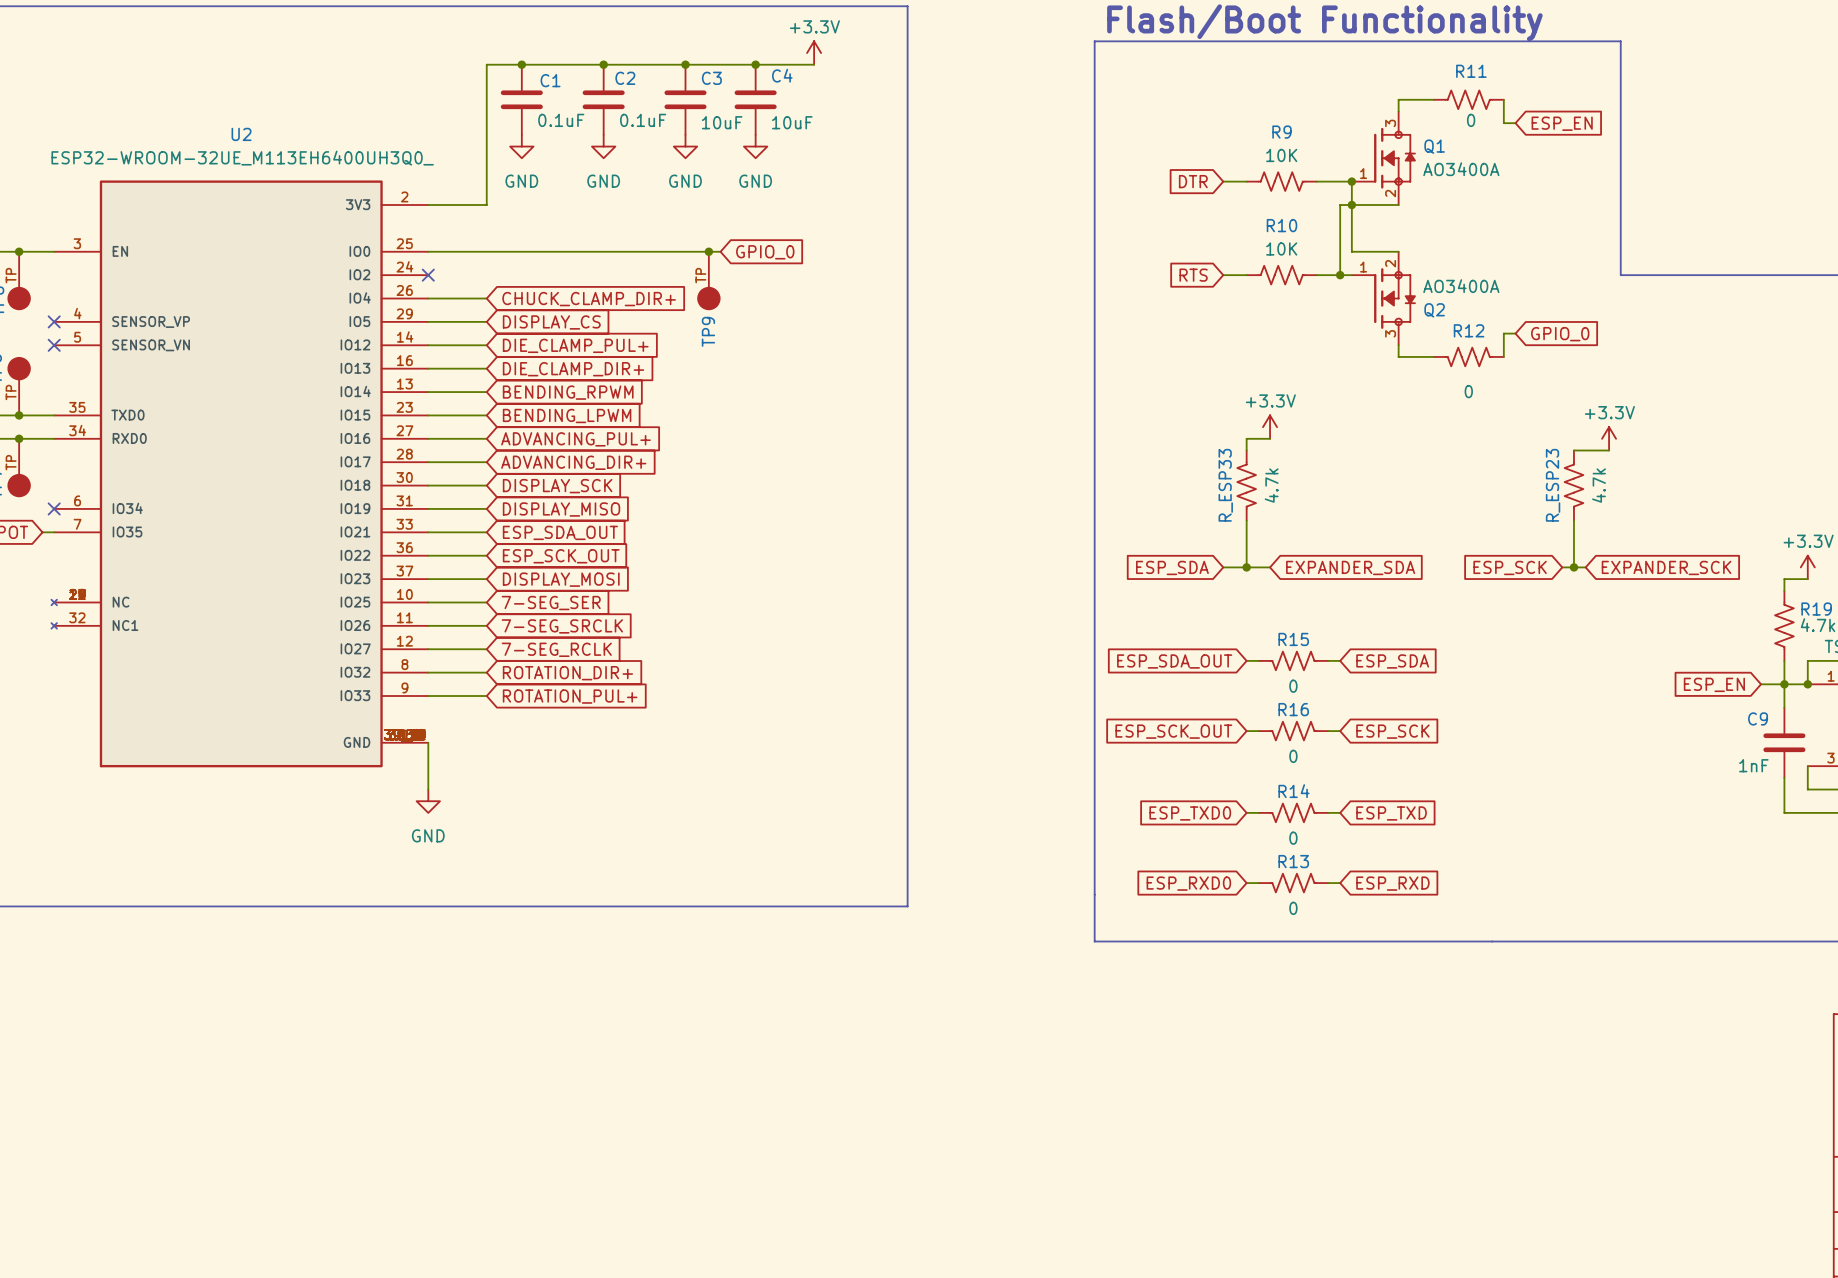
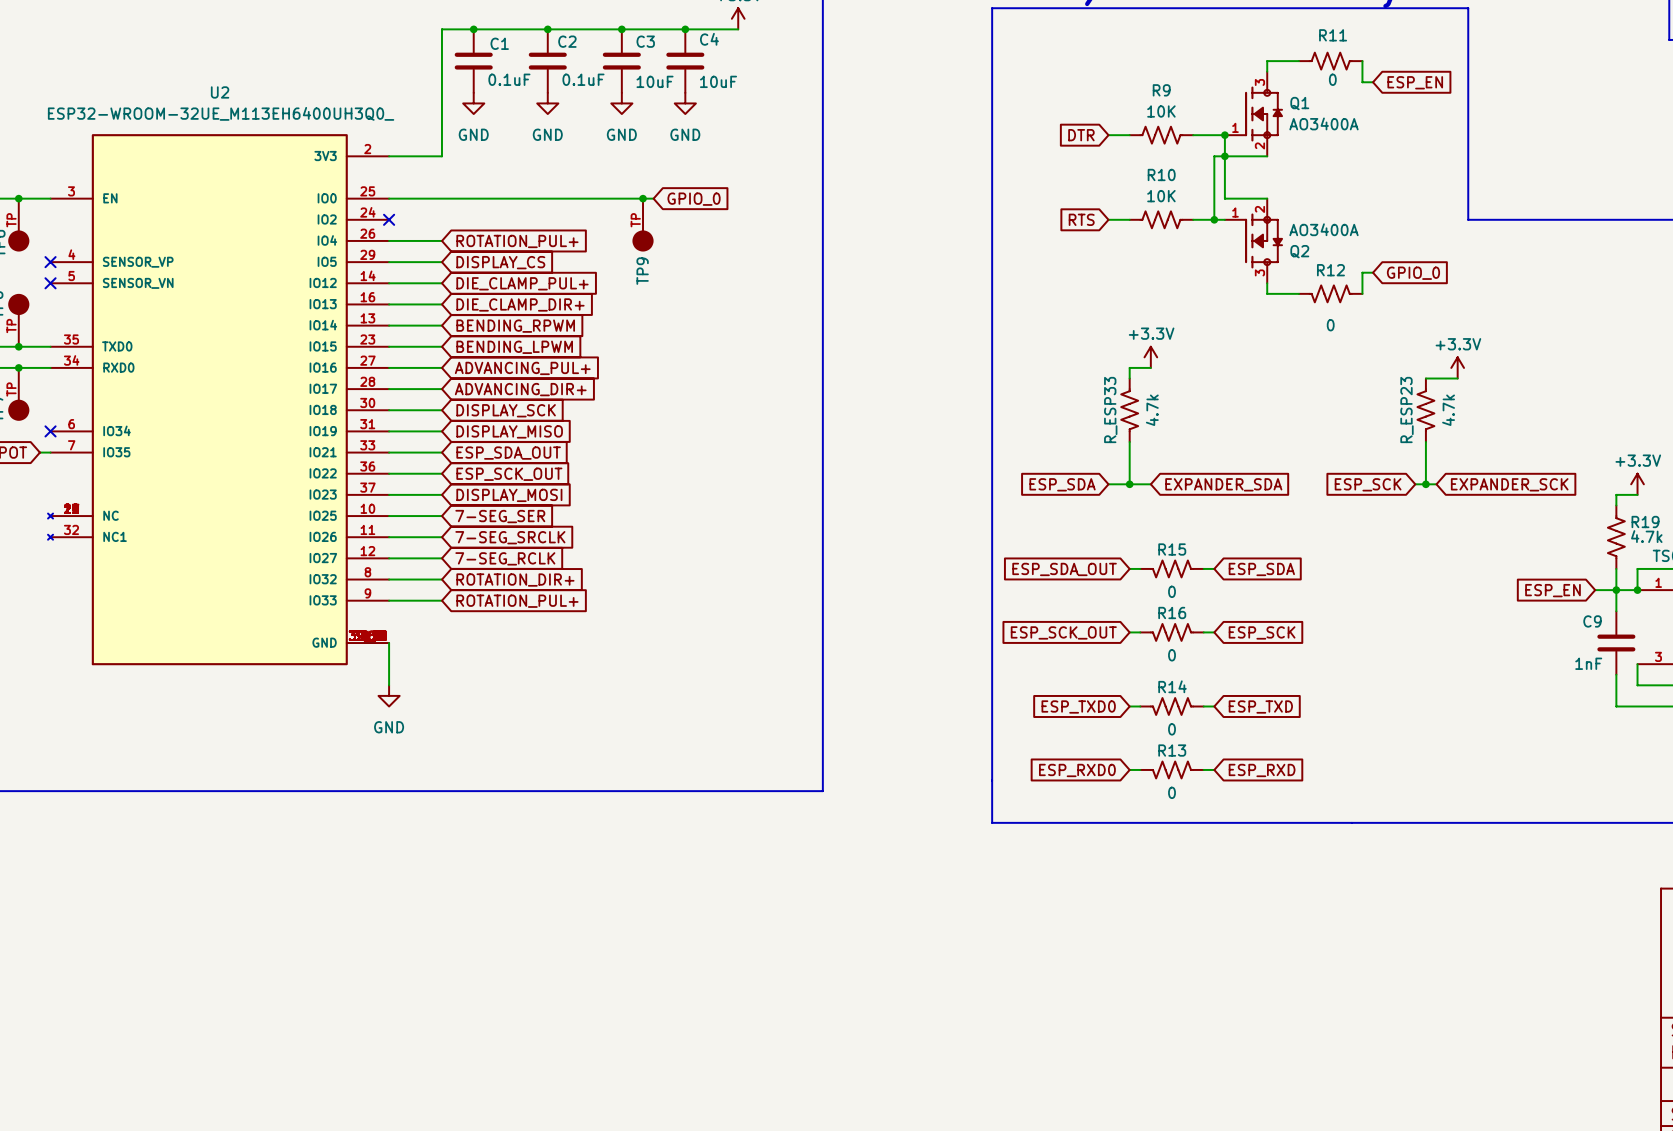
global label: CHUCK_CLAMP_DIR+ (589, 299) -> ROTATION_PUL+ (517, 241)

